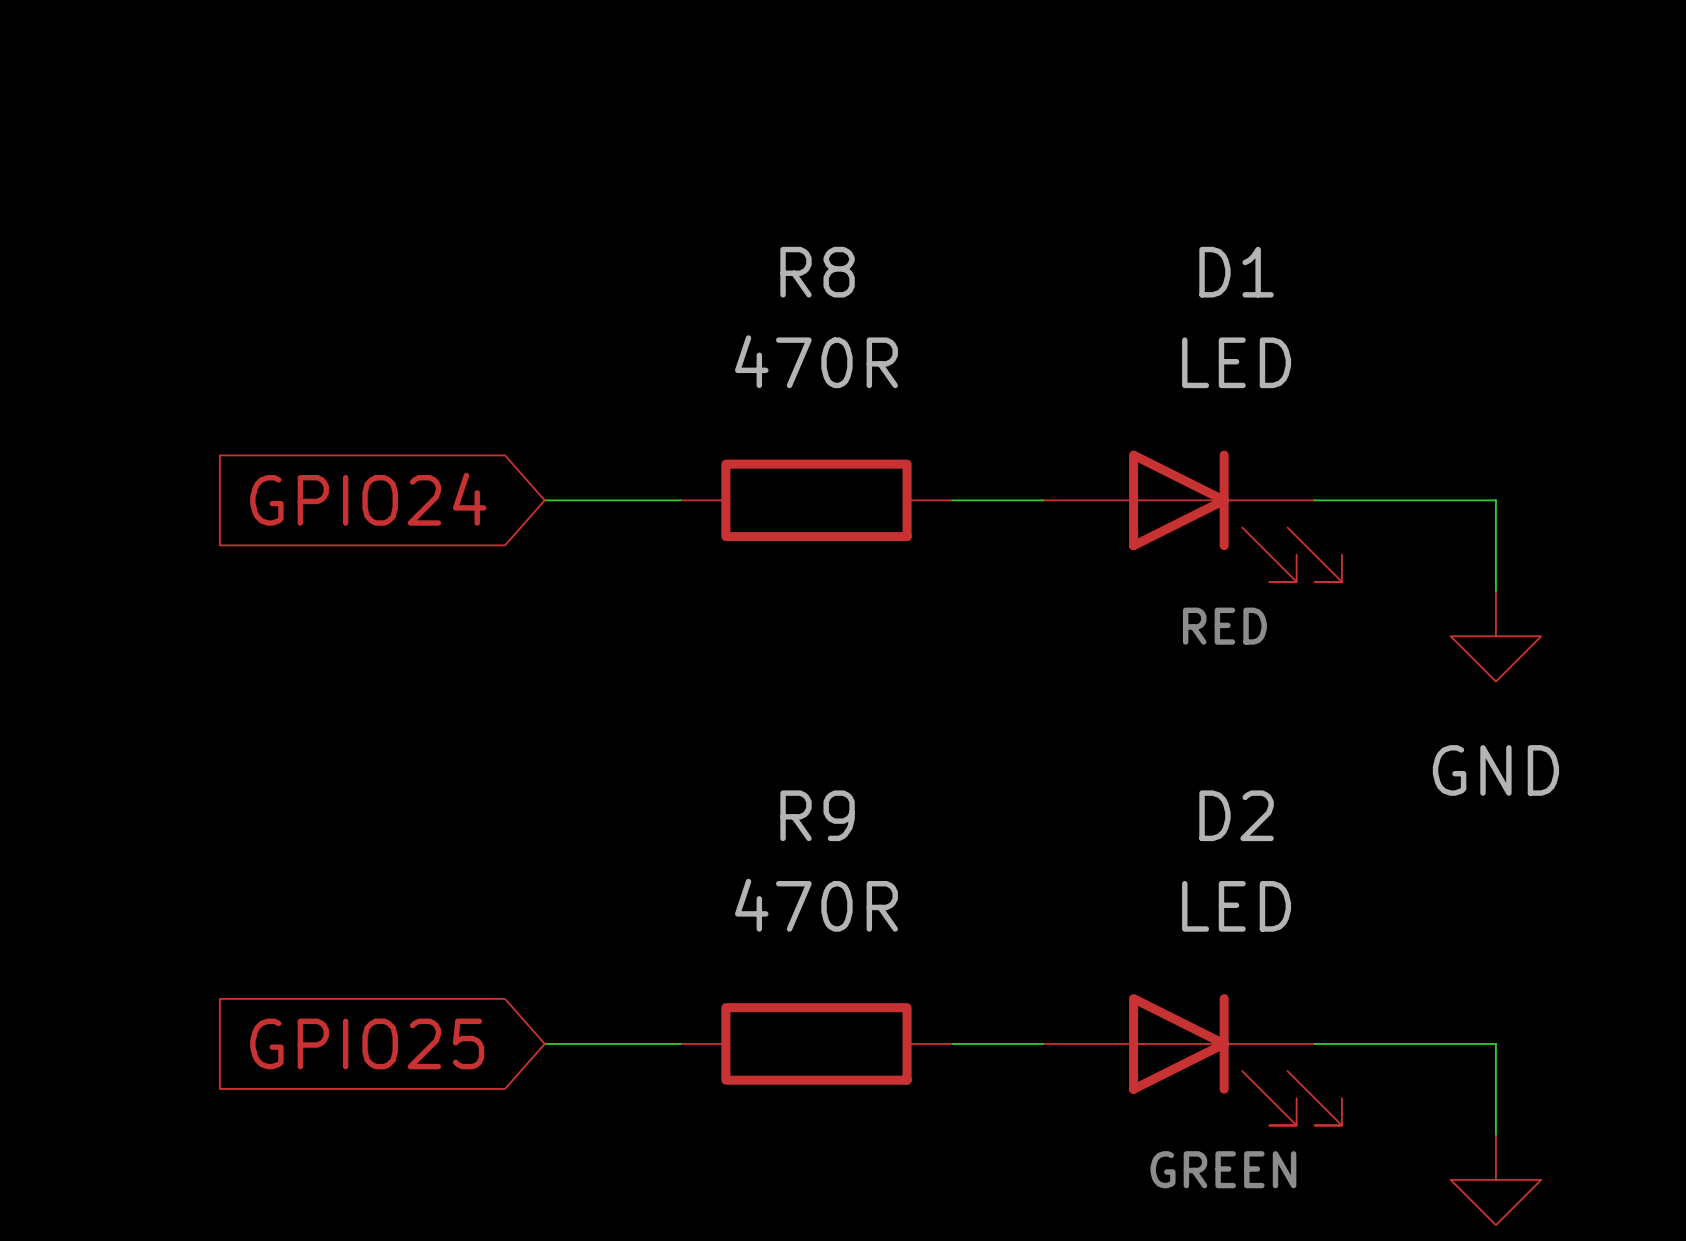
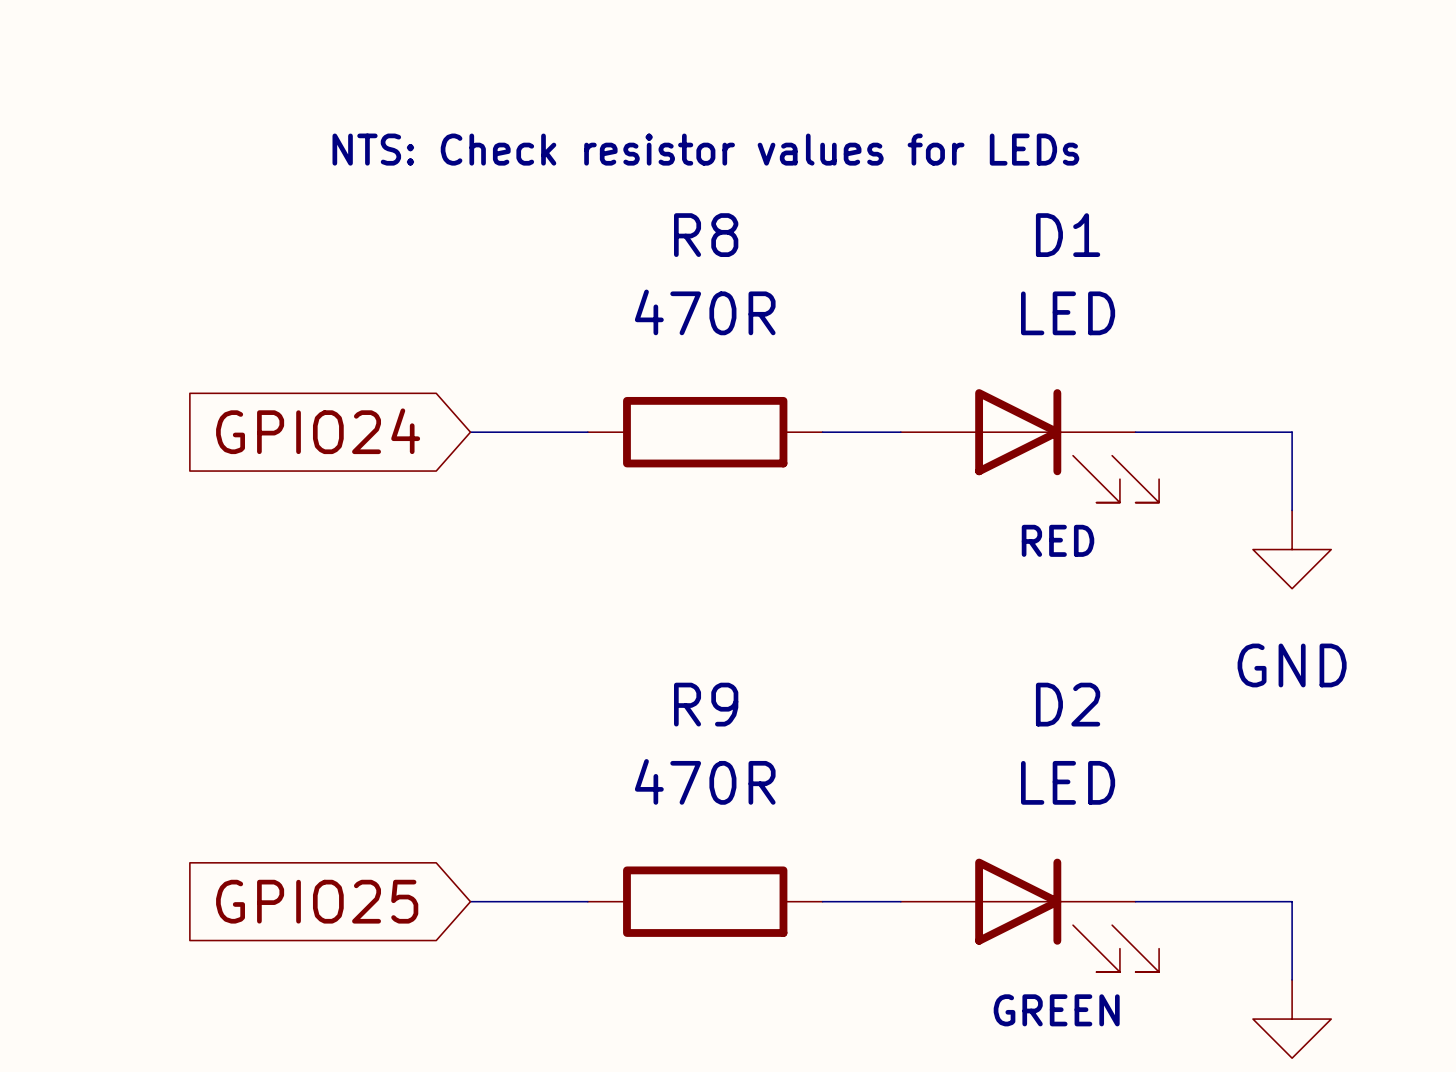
text: none -> NTS: Check resistor values for LEDs (705, 149)

